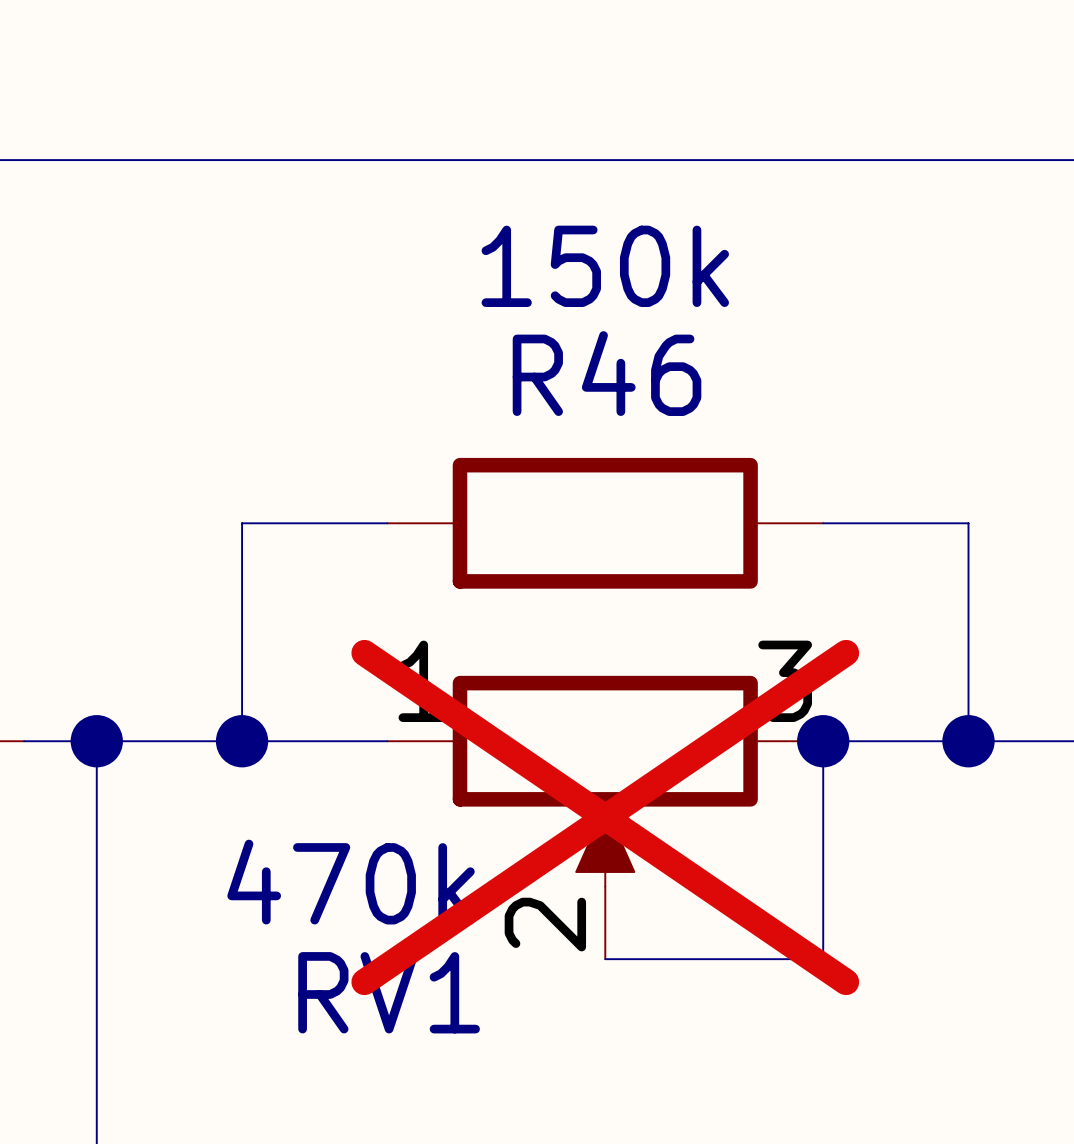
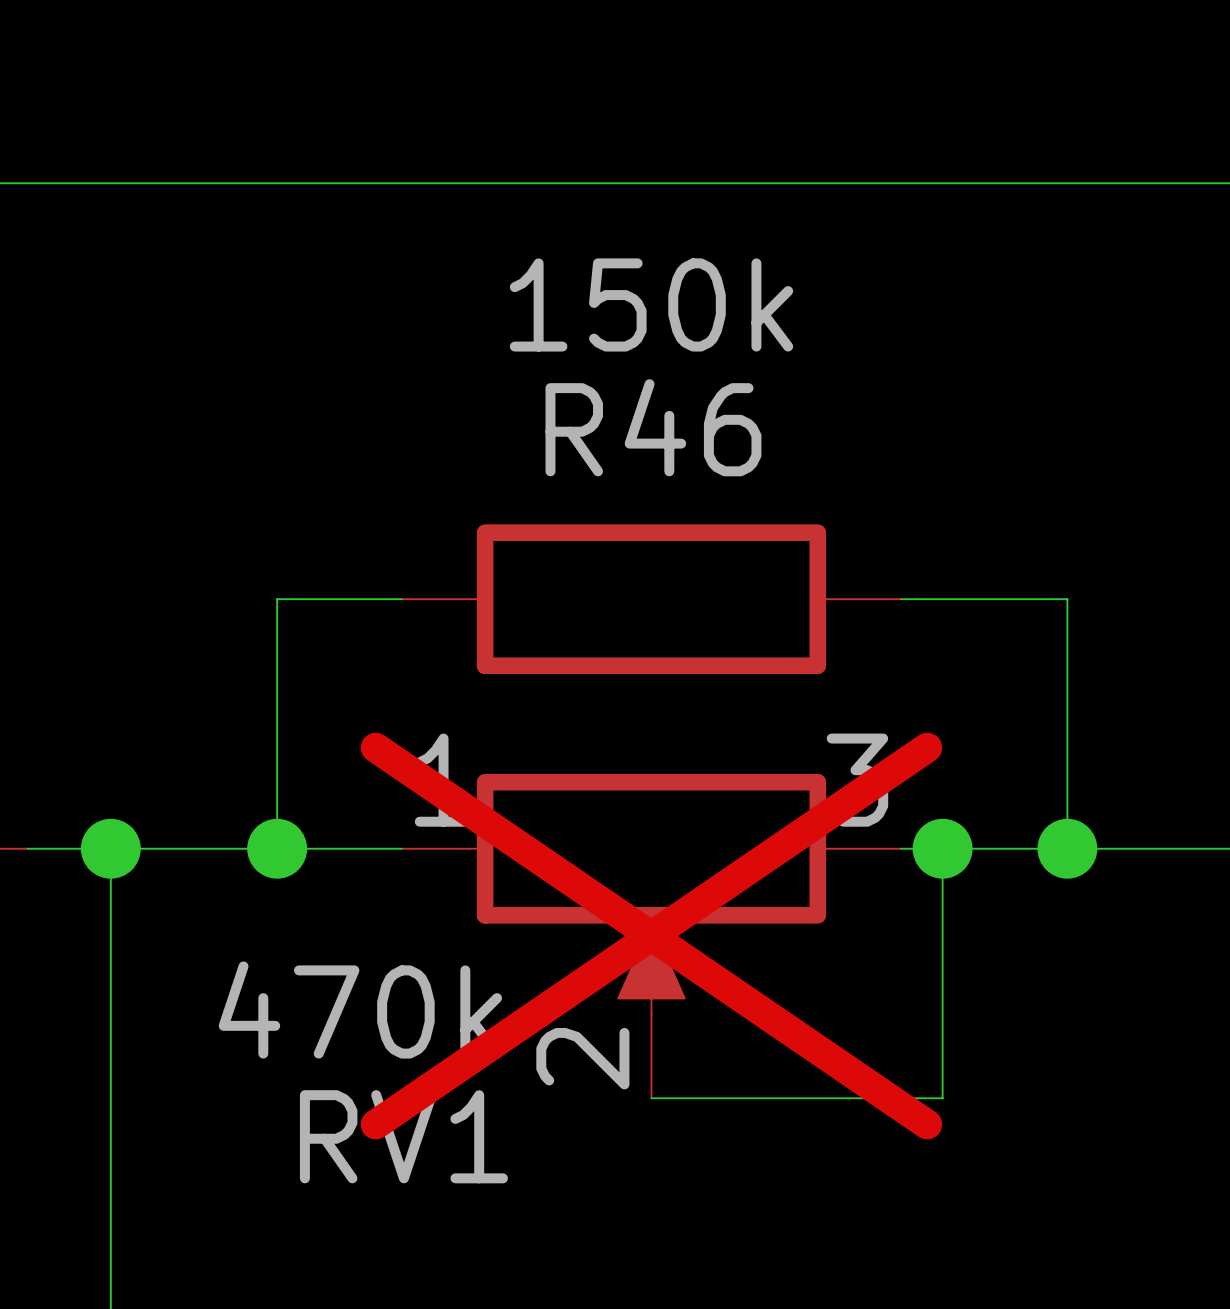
R46 position: (605, 523) -> (651, 599)
wire: (932, 523) (968, 523) (968, 741) -> (1067, 599) (1067, 848)
junction position: (968, 741) -> (1067, 848)
RV1 position: (605, 817) -> (651, 936)
wire: none -> (651, 1098) (693, 1098)

